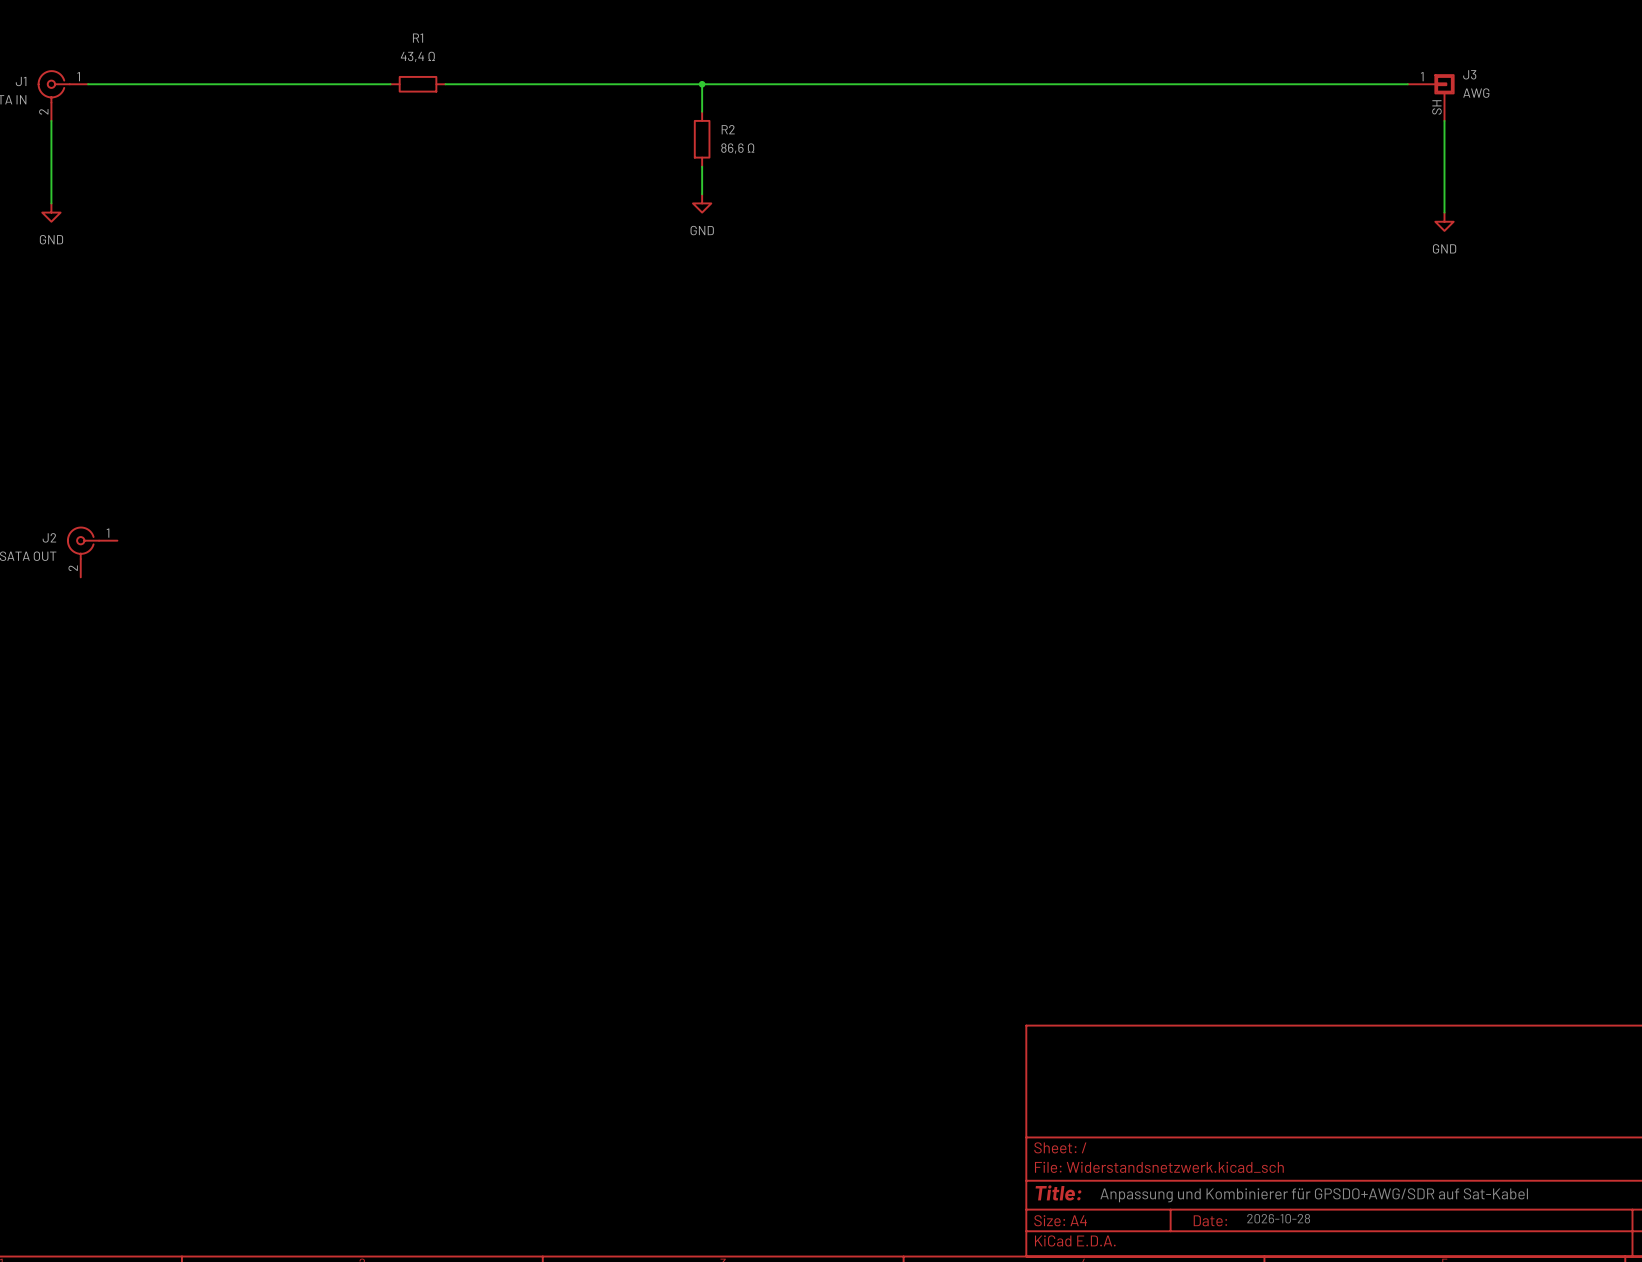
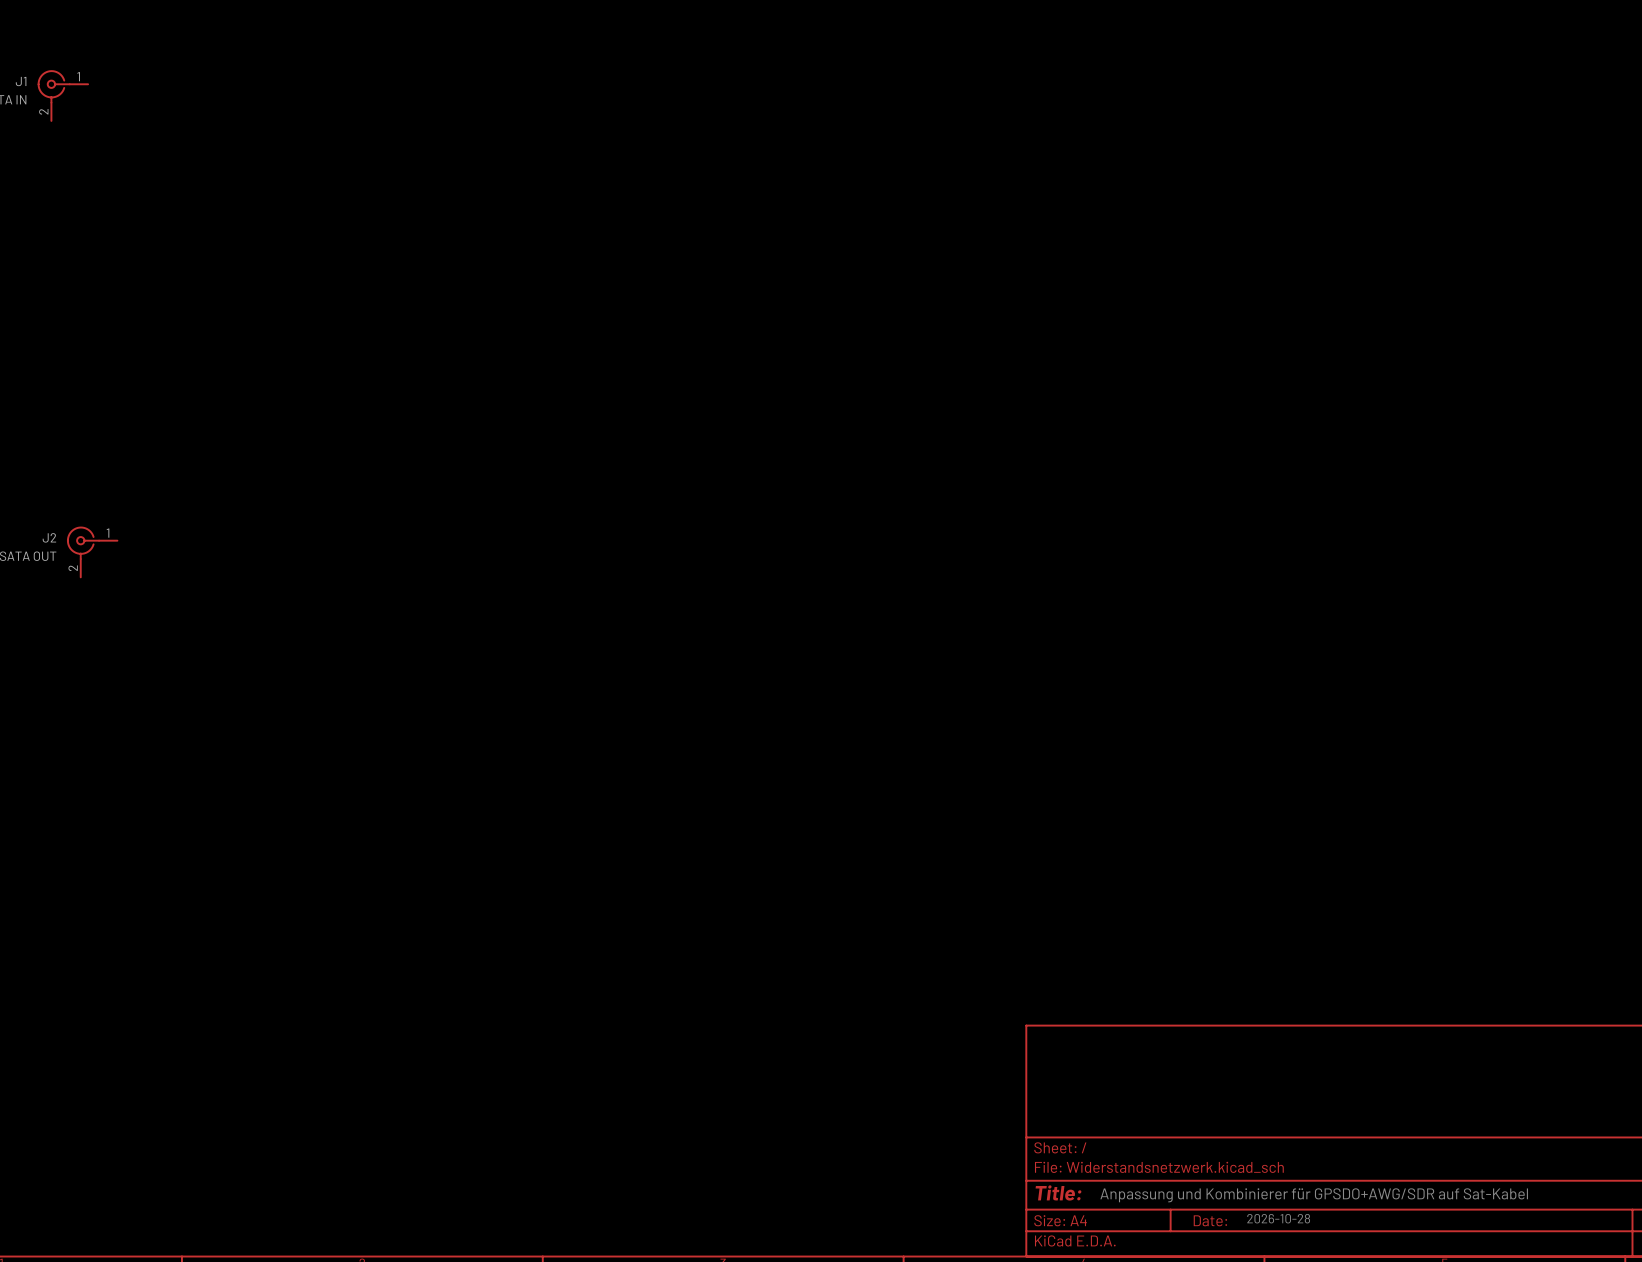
wire: (88, 84) (390, 84) -> none
R1: 43,4 Ω (418, 84) -> none
wire: (445, 84) (1407, 84) -> none
wire: (702, 84) (702, 111) -> none
junction: (702, 84) -> none
J3: AWG (1431, 97) -> none
wire: (51, 120) (51, 203) -> none
wire: (1444, 120) (1444, 212) -> none
R2: 86,6 Ω (702, 139) -> none
wire: (702, 166) (702, 194) -> none
power symbol: GND (702, 203) -> none
power symbol: GND (51, 212) -> none
power symbol: GND (1444, 221) -> none

